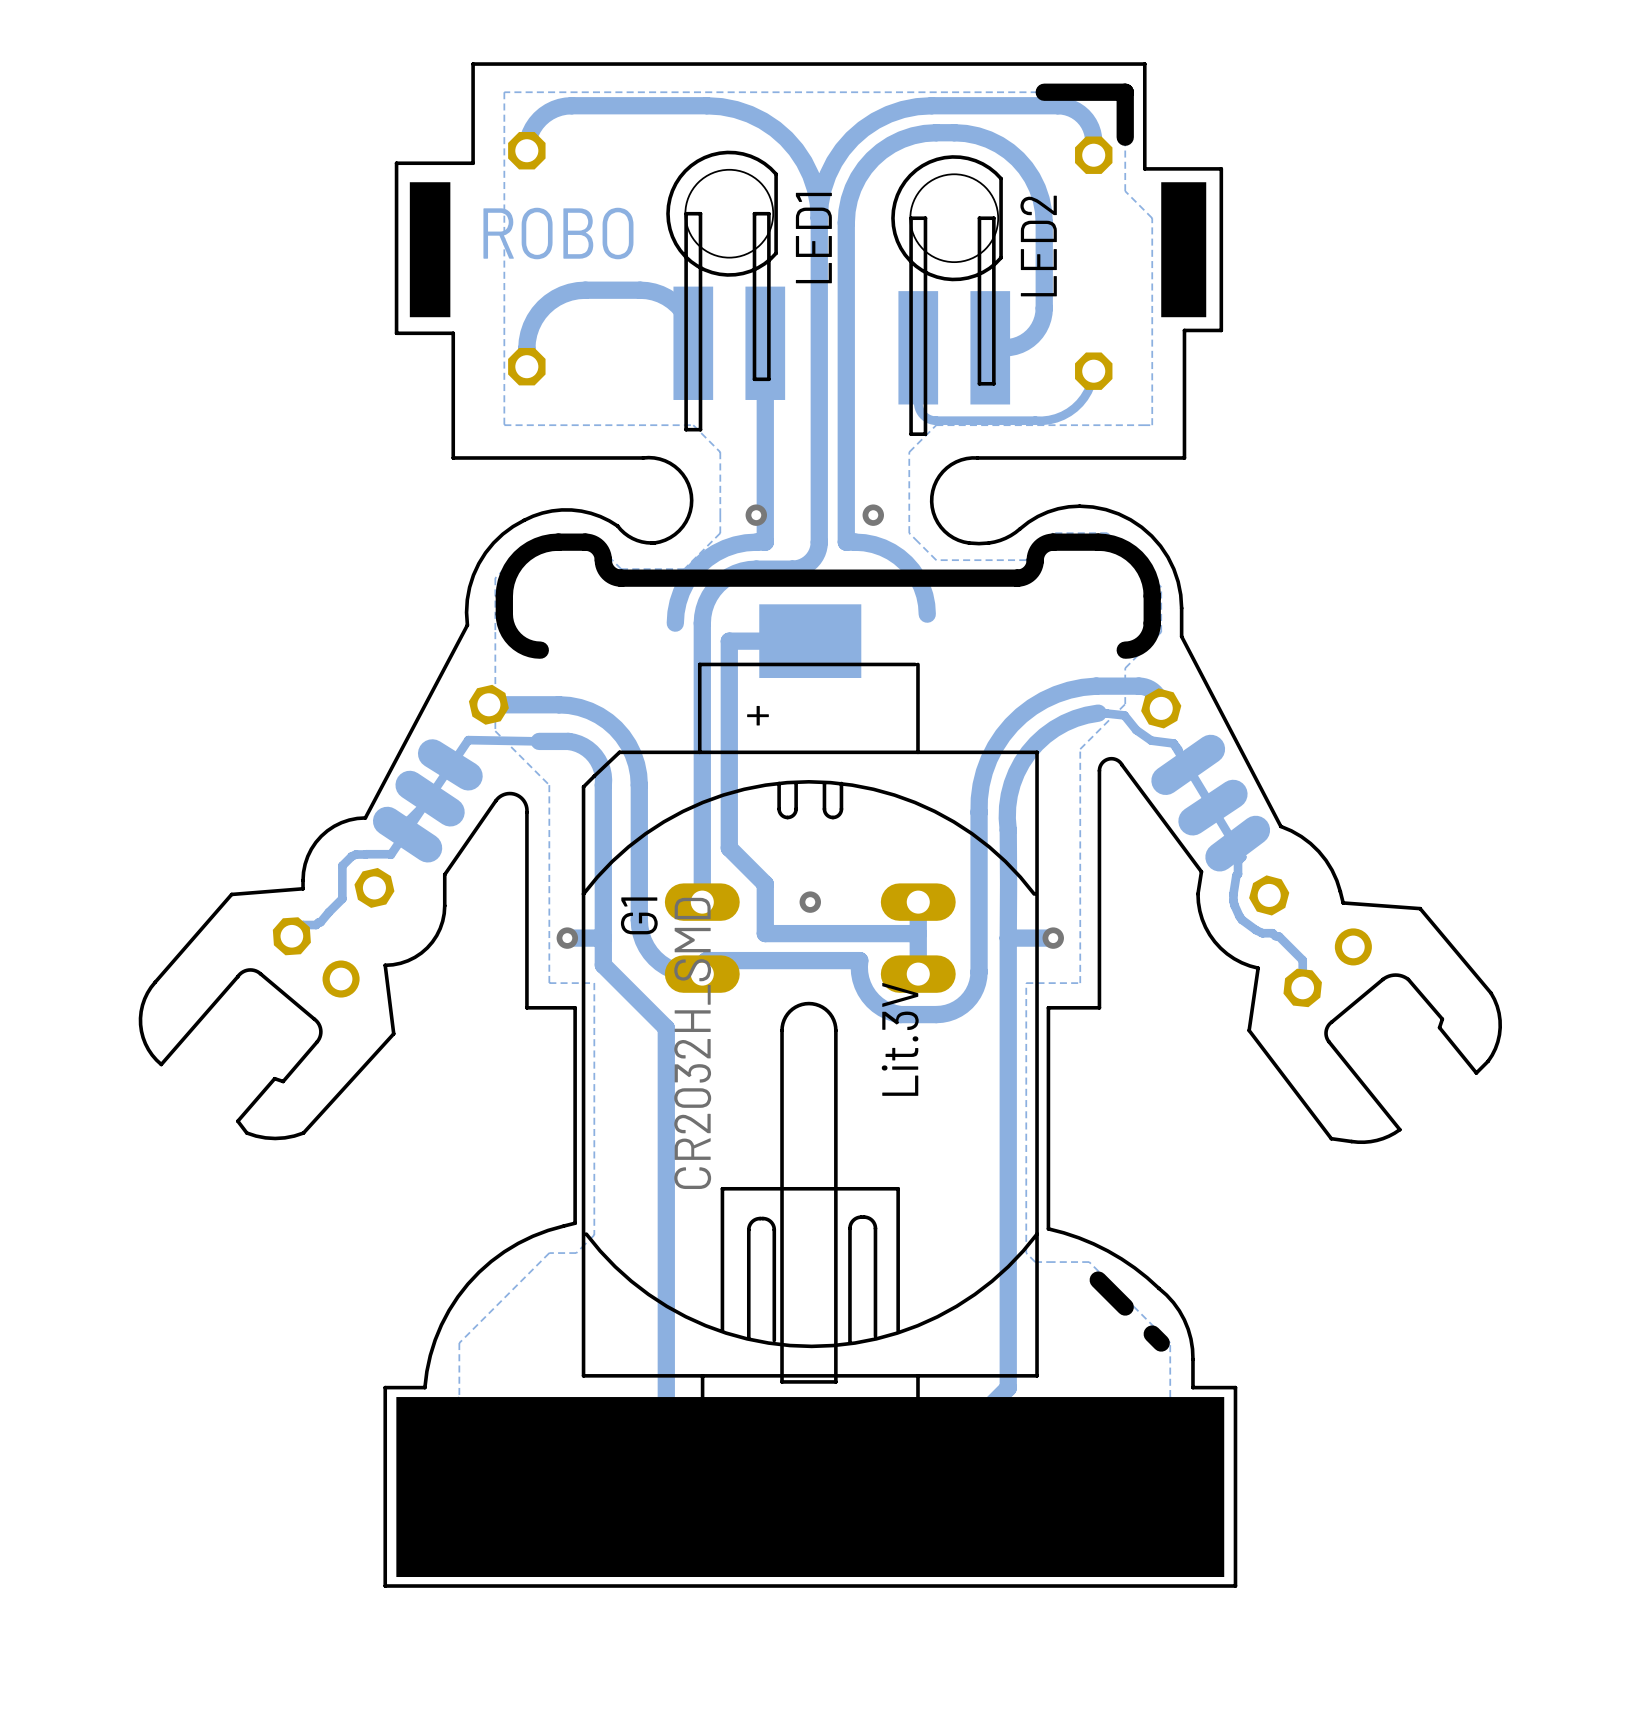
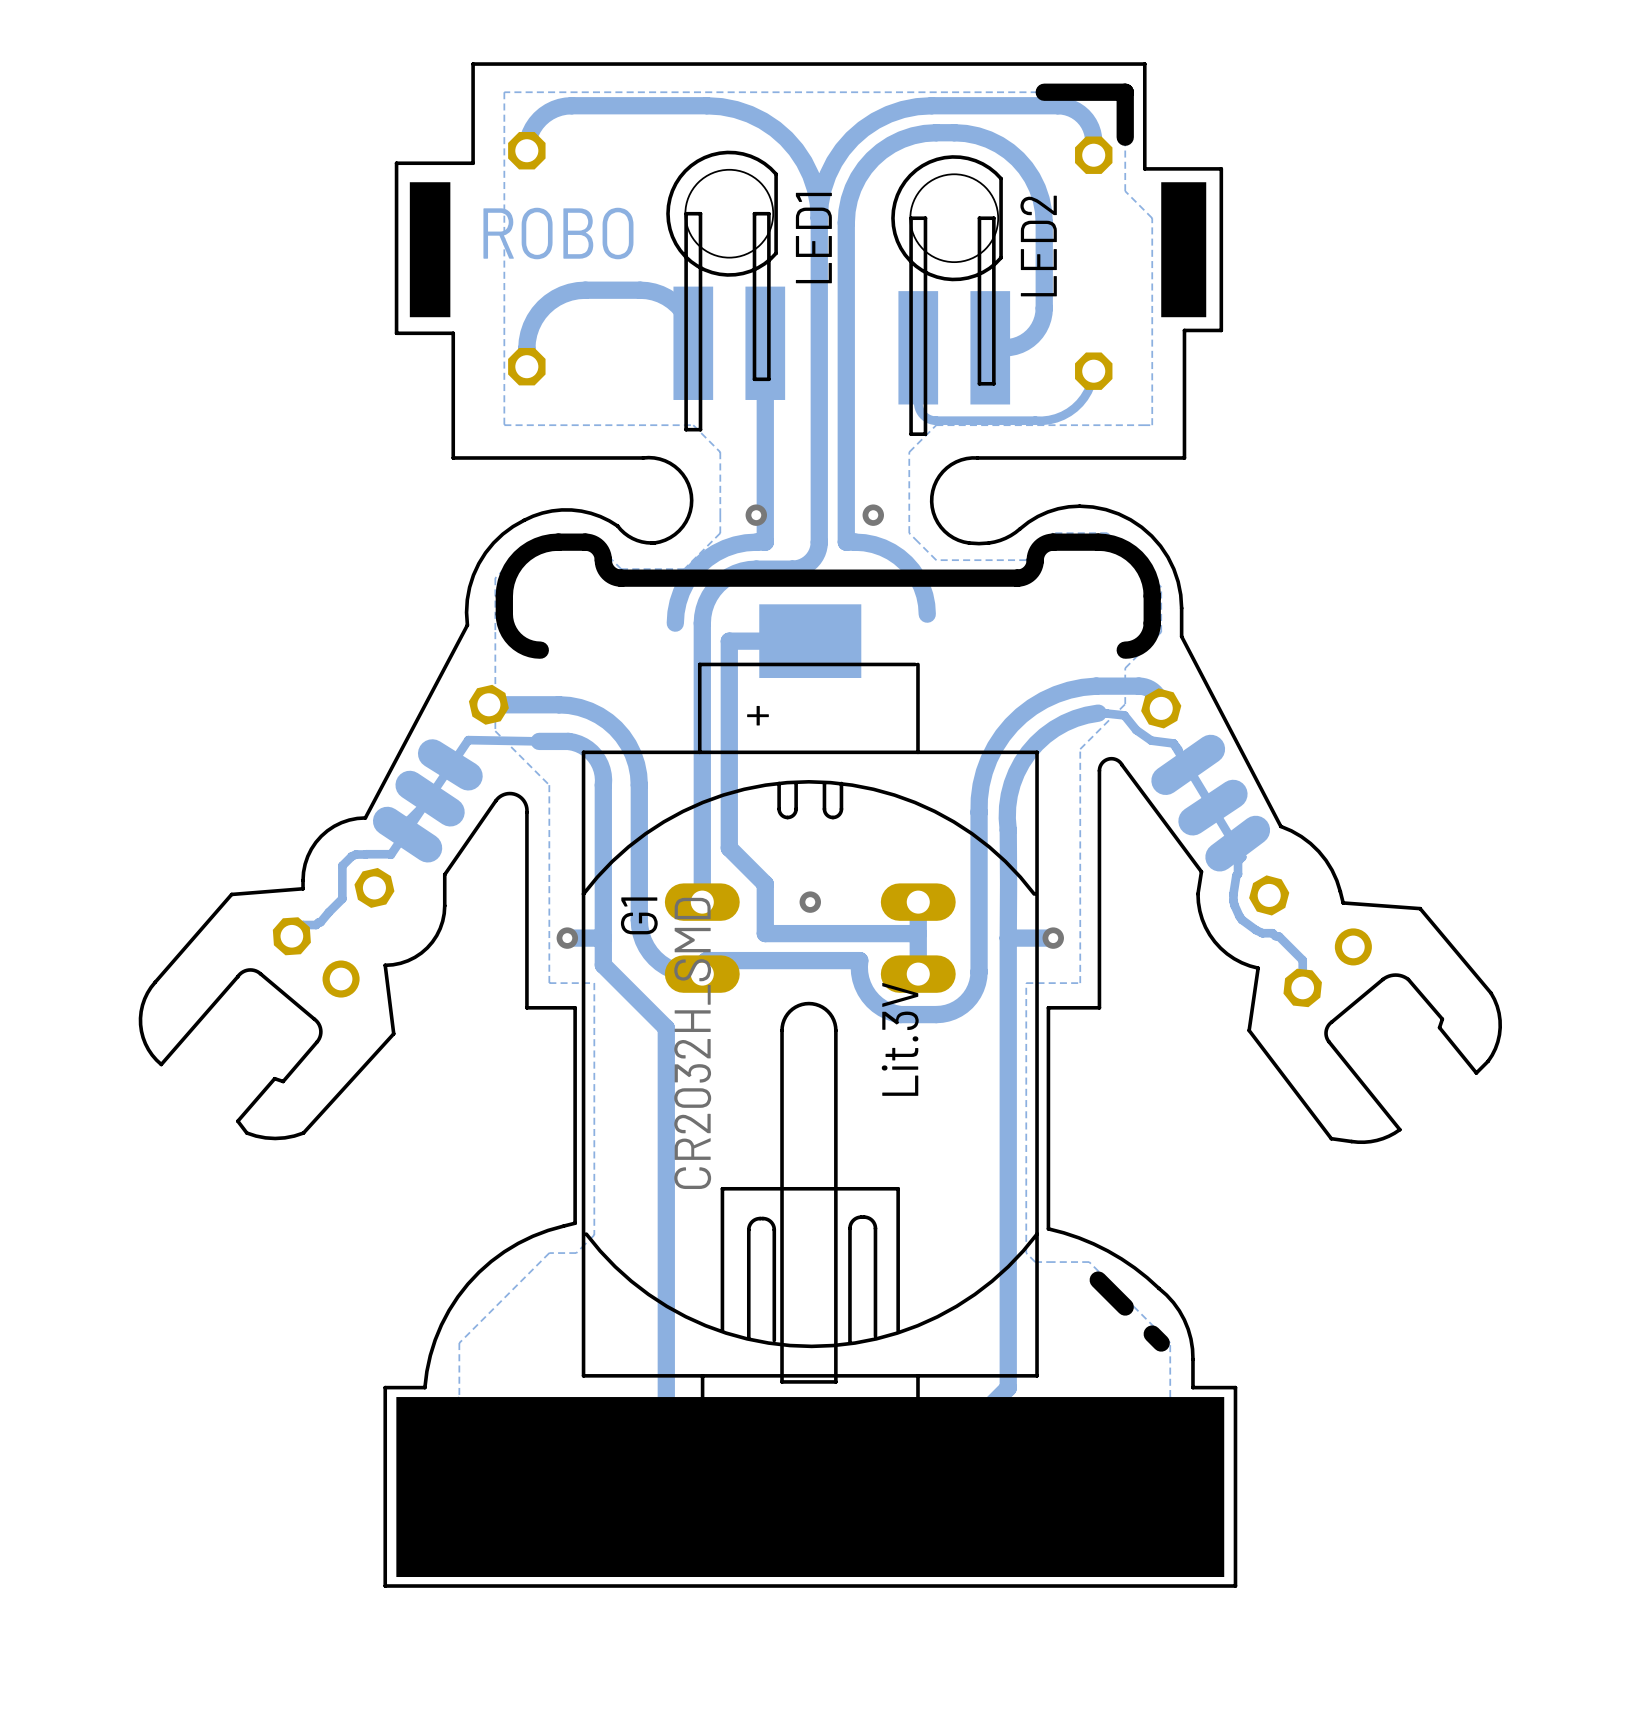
G1 footprint: [581, 604, 1039, 1524] -> [581, 604, 1039, 1524]

